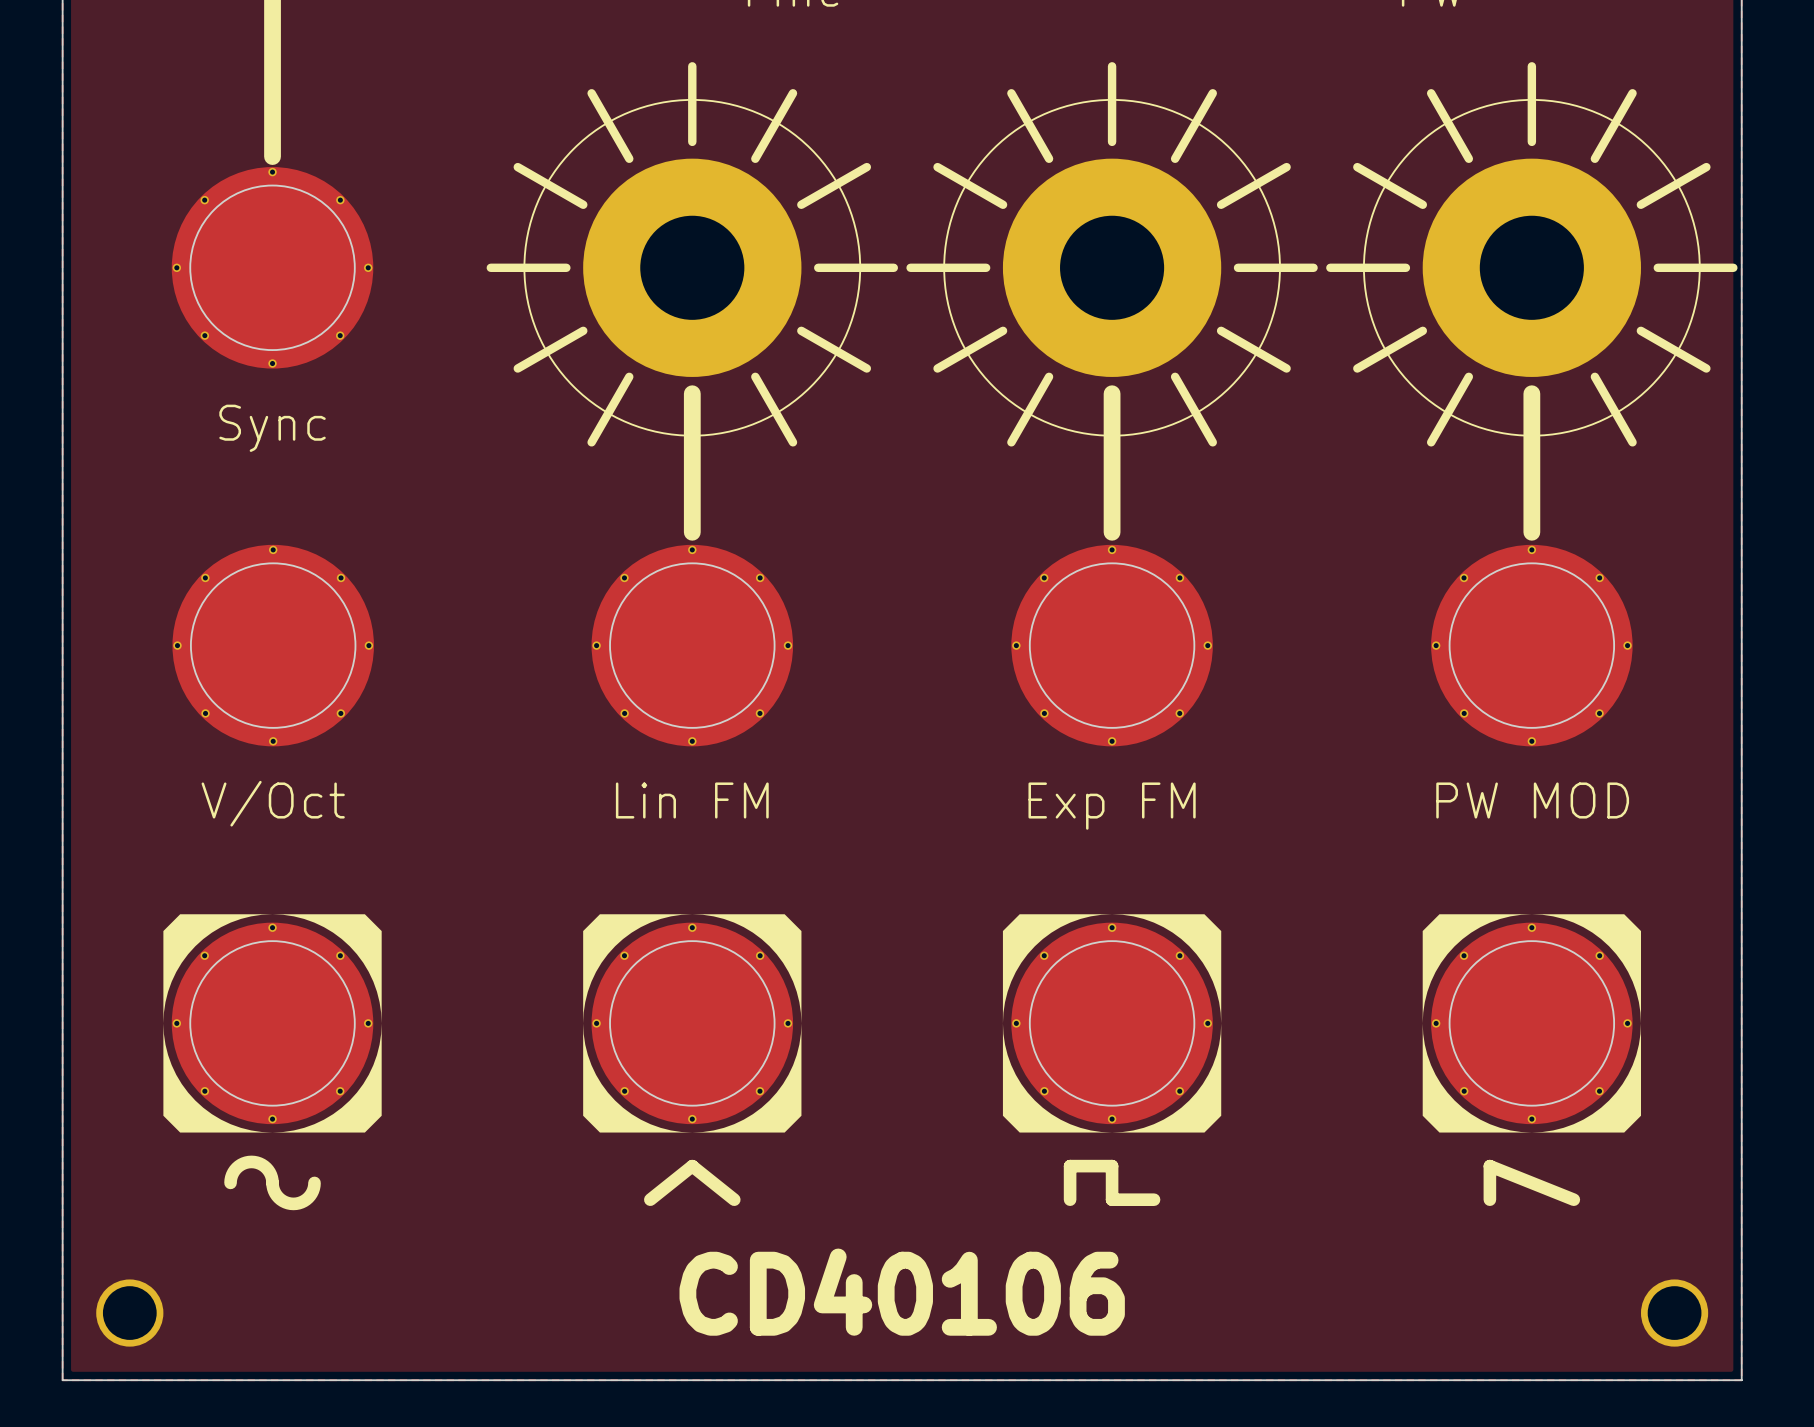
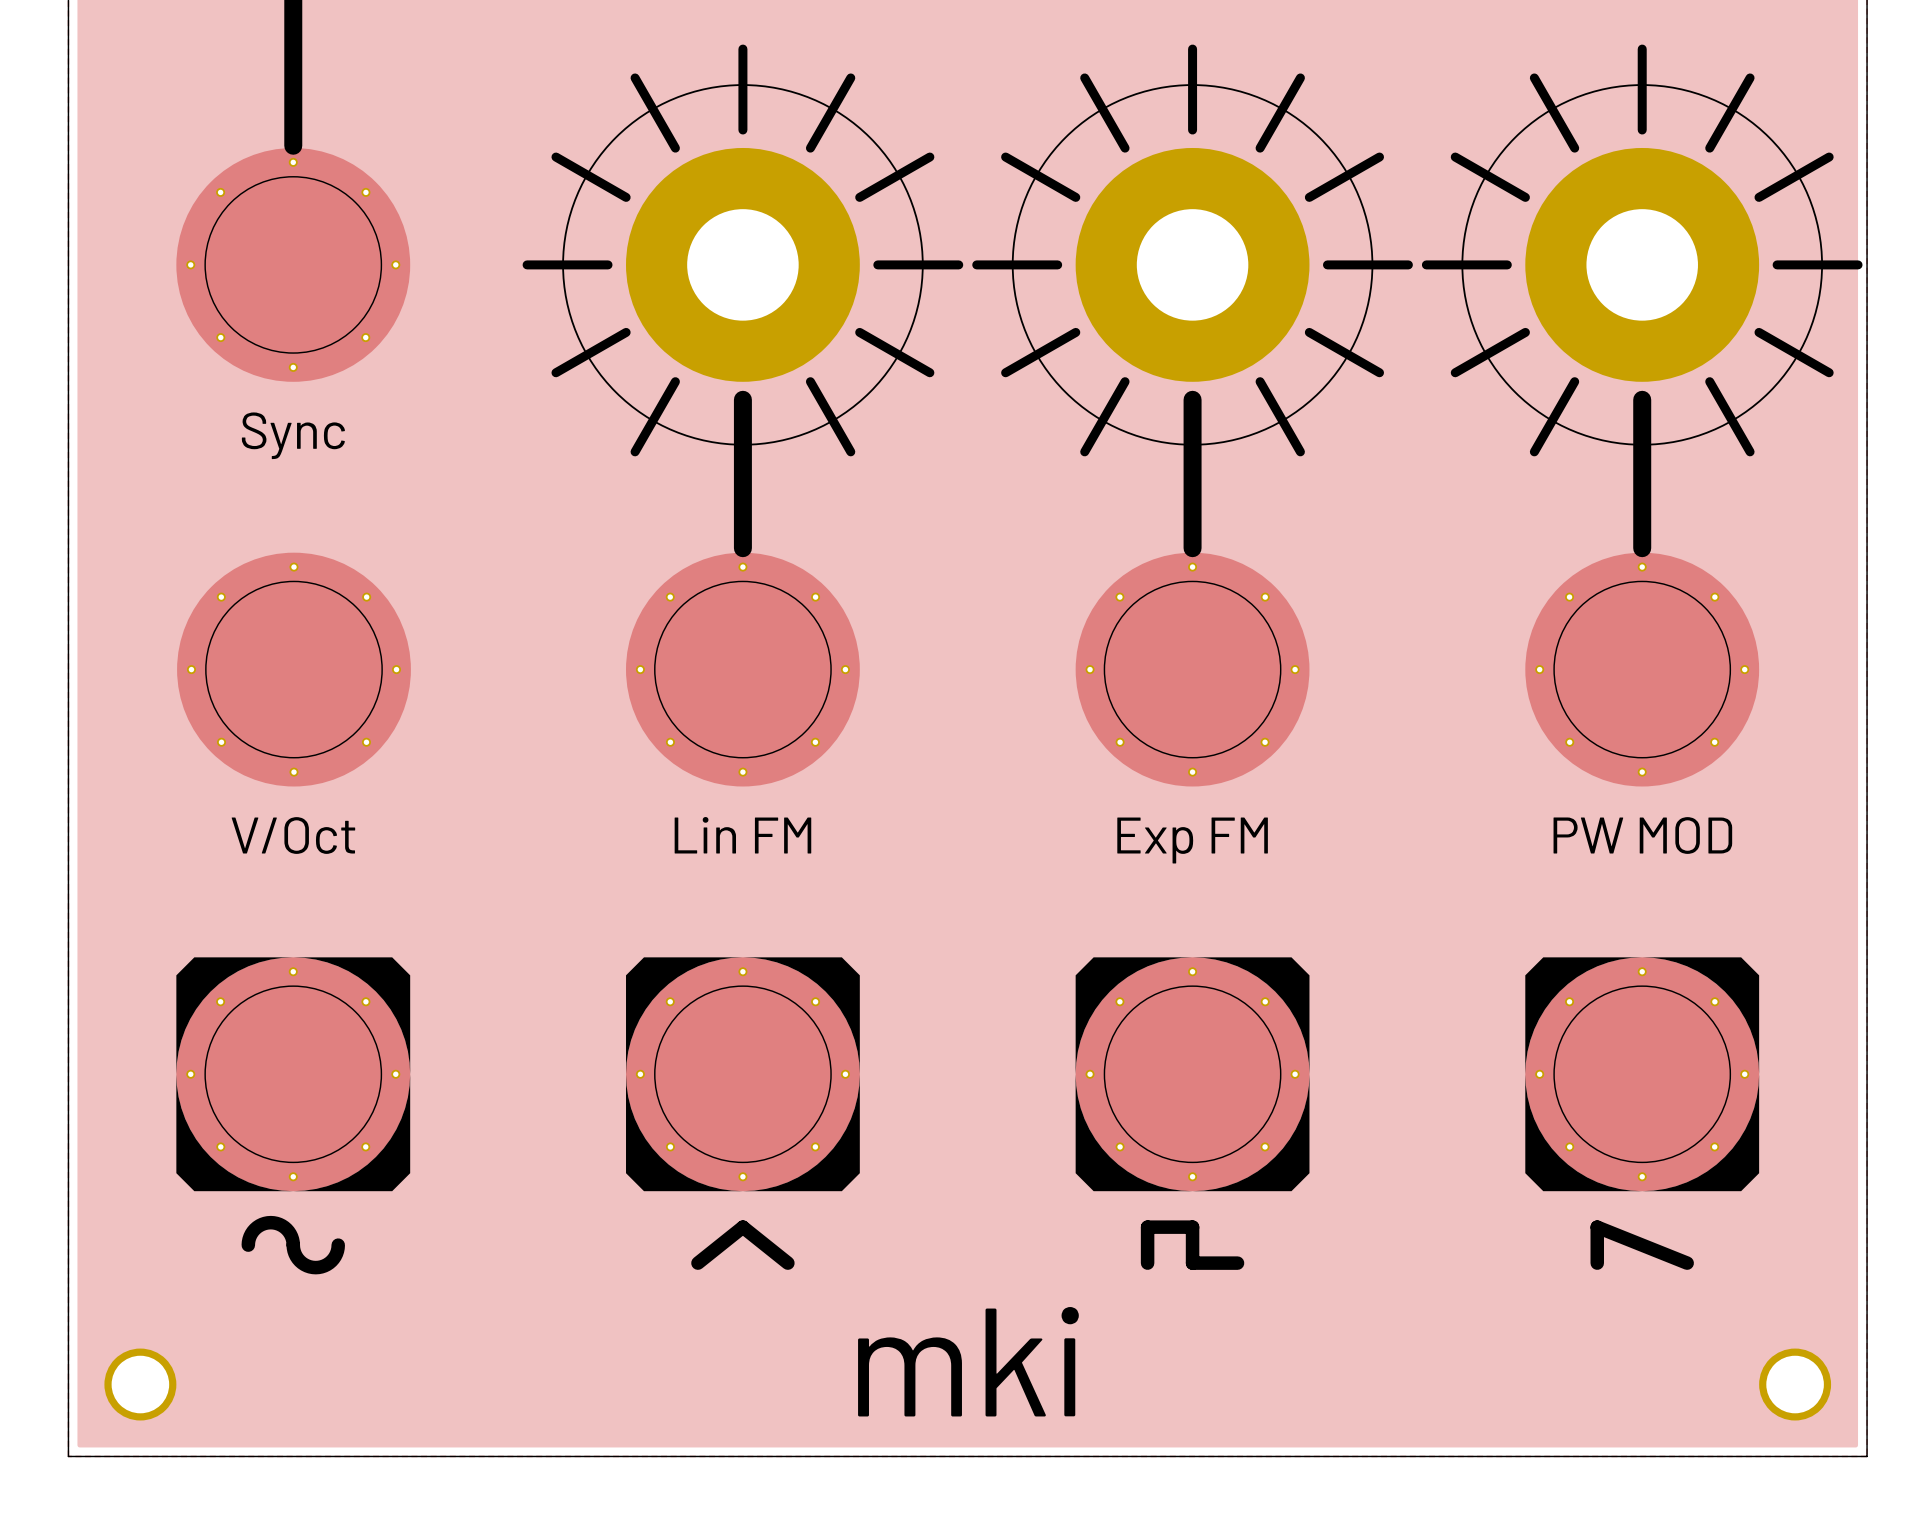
part footprint: [171, 167, 374, 369] -> [176, 147, 411, 382]
part footprint: [172, 544, 374, 747] -> [177, 552, 411, 787]
part footprint: [591, 544, 794, 747] -> [626, 552, 860, 787]
part footprint: [1011, 544, 1213, 747] -> [1075, 552, 1310, 787]
part footprint: [1431, 544, 1633, 747] -> [1525, 552, 1760, 787]
part footprint: [163, 914, 382, 1133] -> [176, 957, 411, 1192]
part footprint: [583, 914, 802, 1133] -> [626, 957, 860, 1192]
part footprint: [1002, 914, 1222, 1133] -> [1075, 957, 1310, 1192]
part footprint: [1422, 914, 1641, 1133] -> [1525, 957, 1760, 1192]
text: CD40106 (902, 1292) -> mki (968, 1361)

